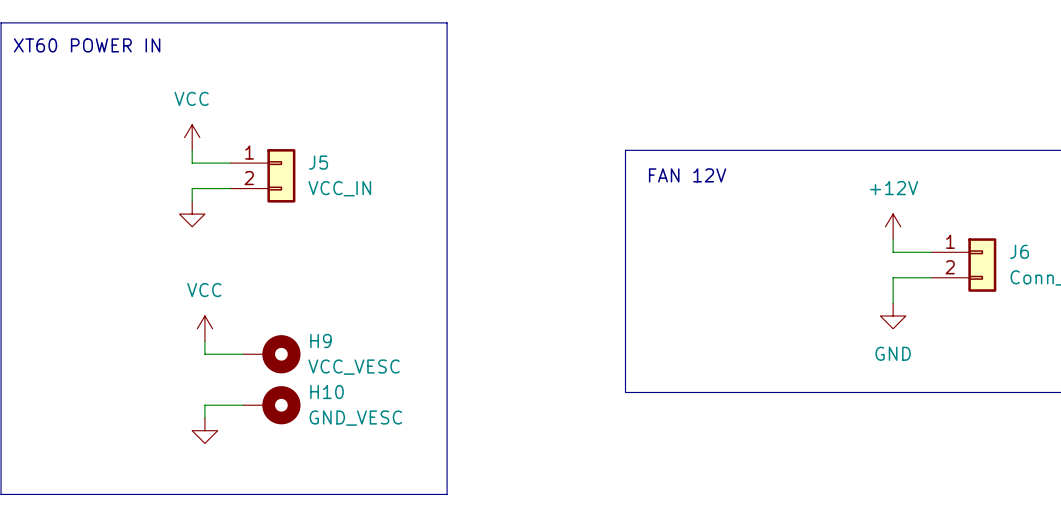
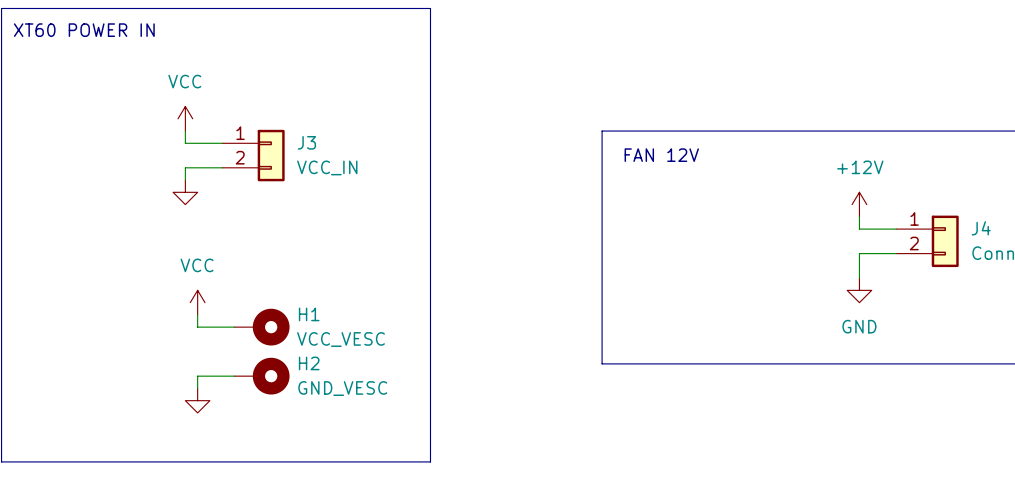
J5 name: J5 (318, 162) -> J3 (306, 142)
J6 name: J6 (1019, 251) -> J4 (981, 228)
H9 name: H9 (320, 341) -> H1 (309, 314)
H10 name: H10 (327, 392) -> H2 (309, 363)

